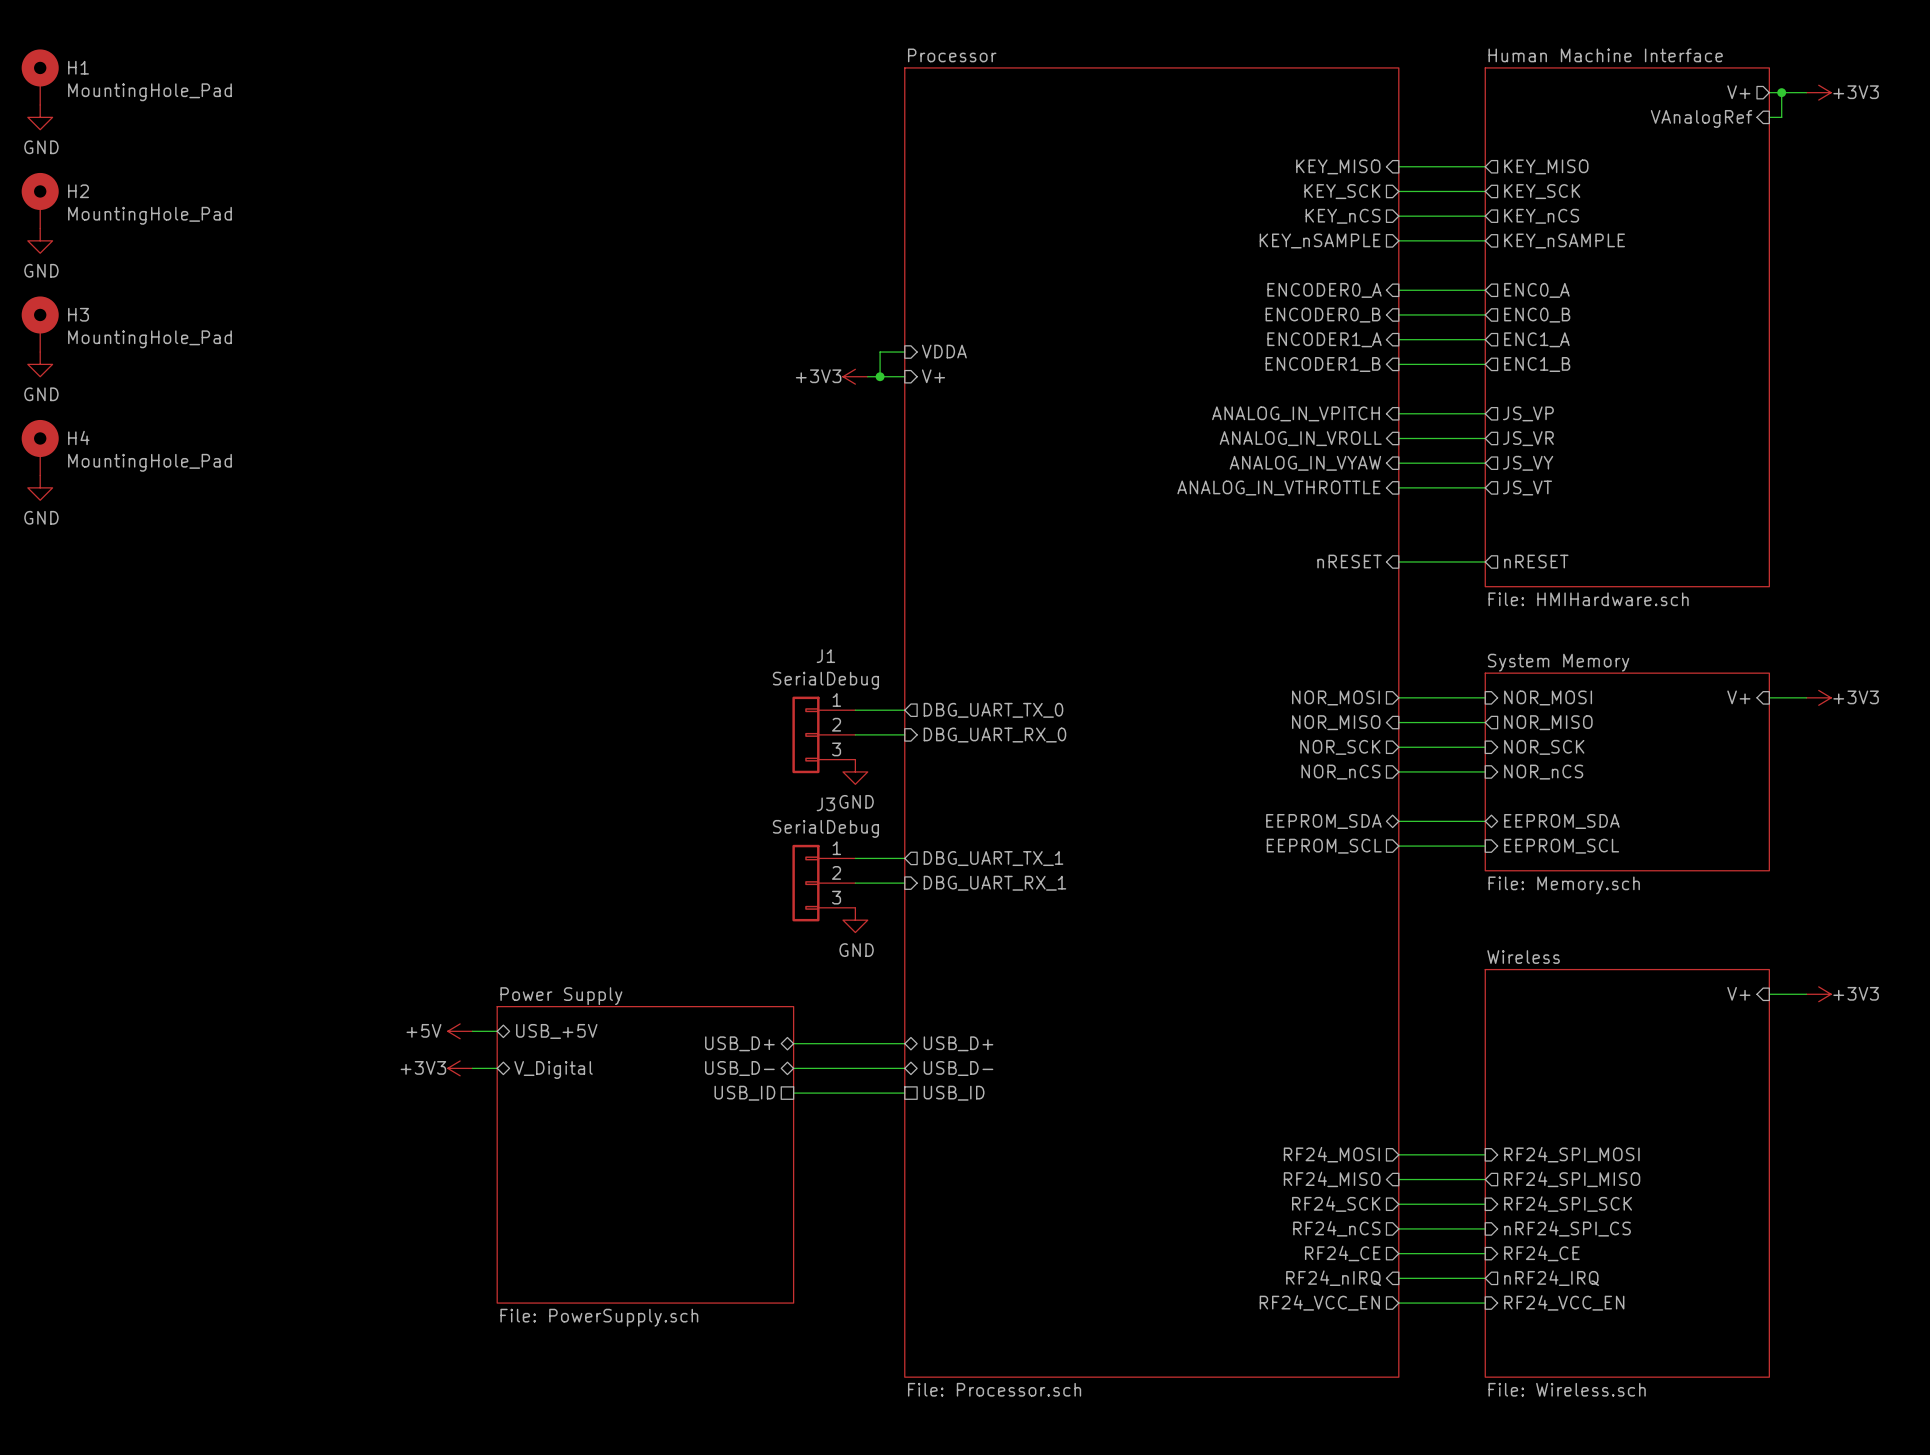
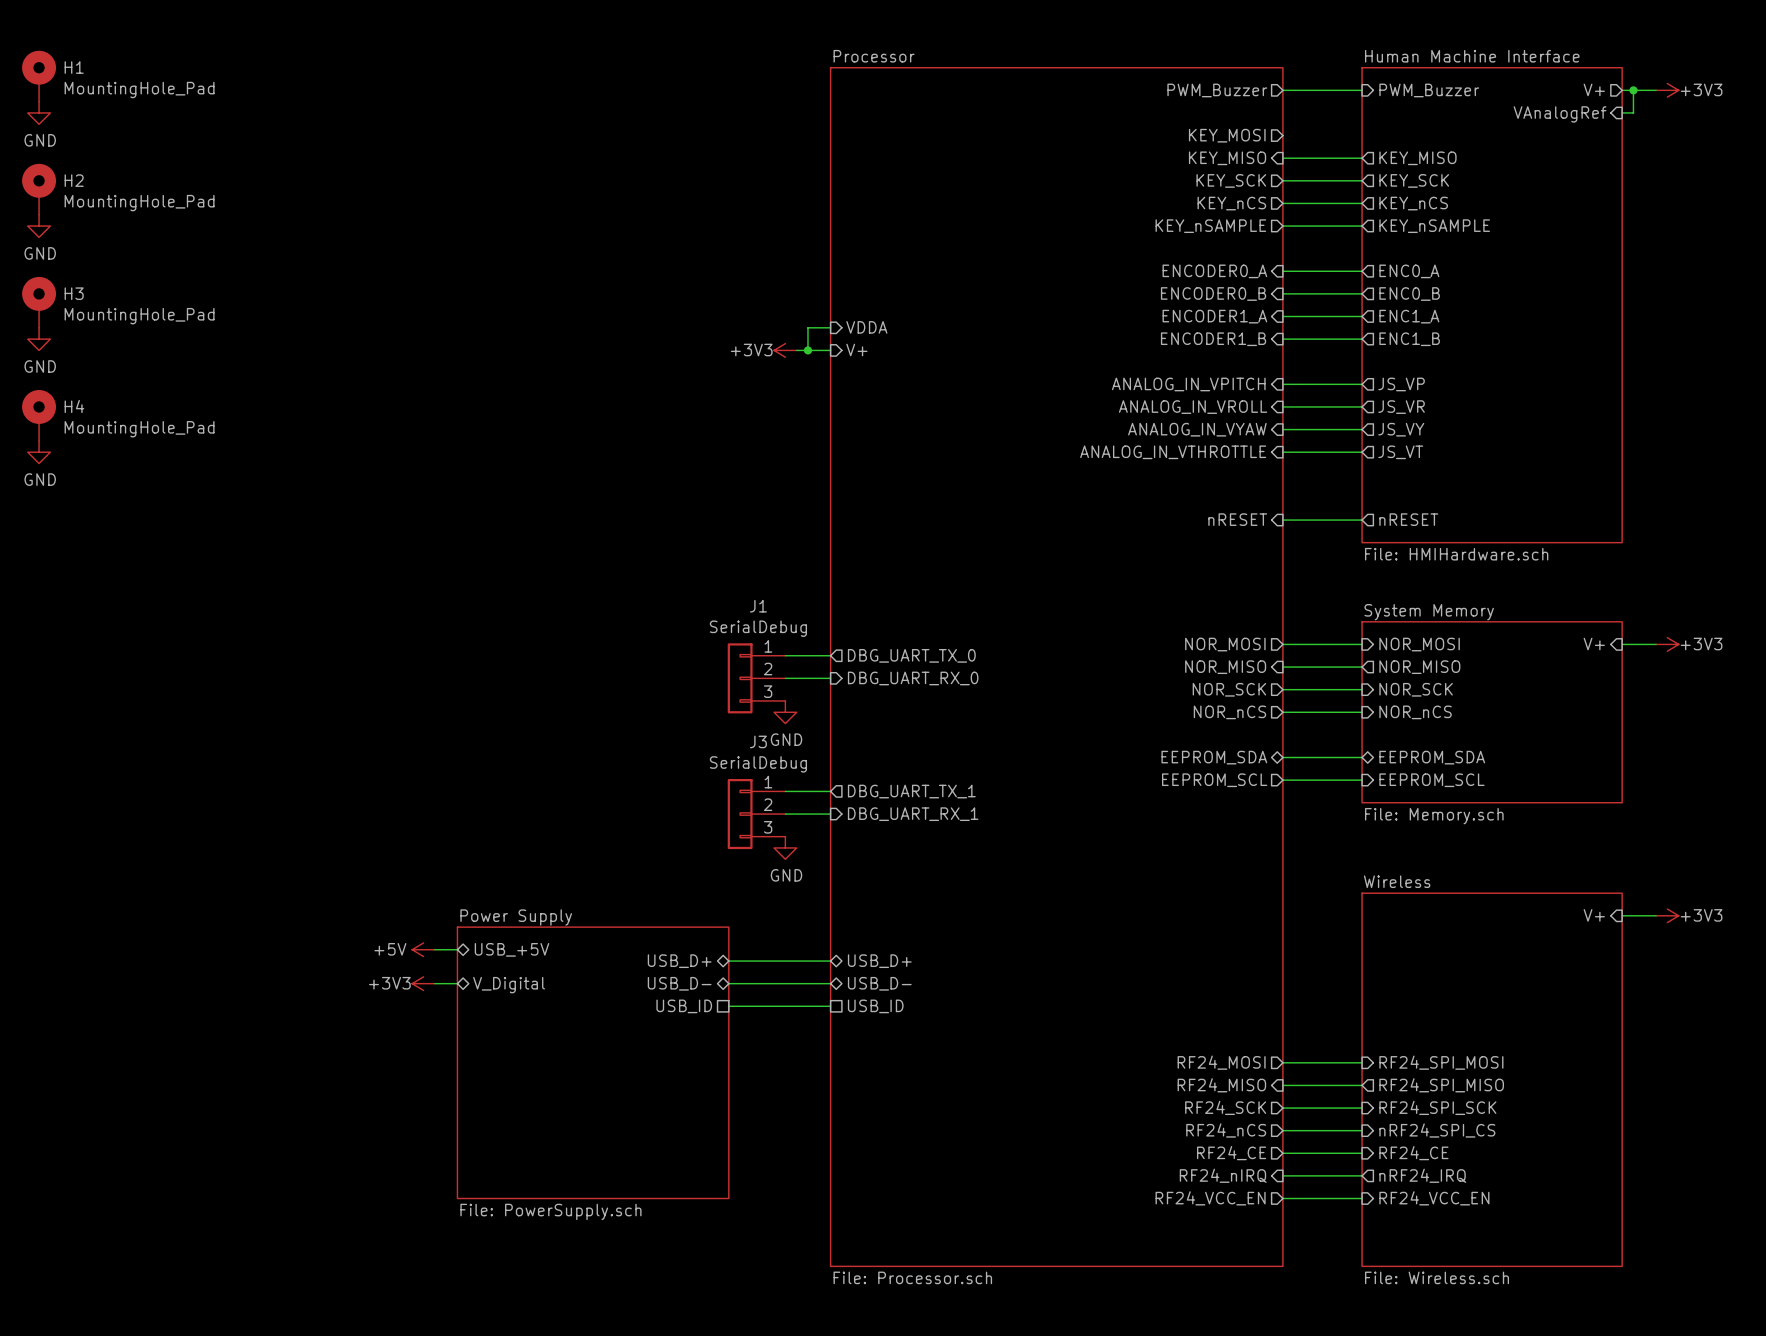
sheet pin: none -> PWM_Buzzer (1217, 90)
wire: none -> (1282, 90) (1362, 90)
sheet pin: none -> PWM_Buzzer (1429, 90)
sheet pin: none -> KEY_MOSI (1227, 135)

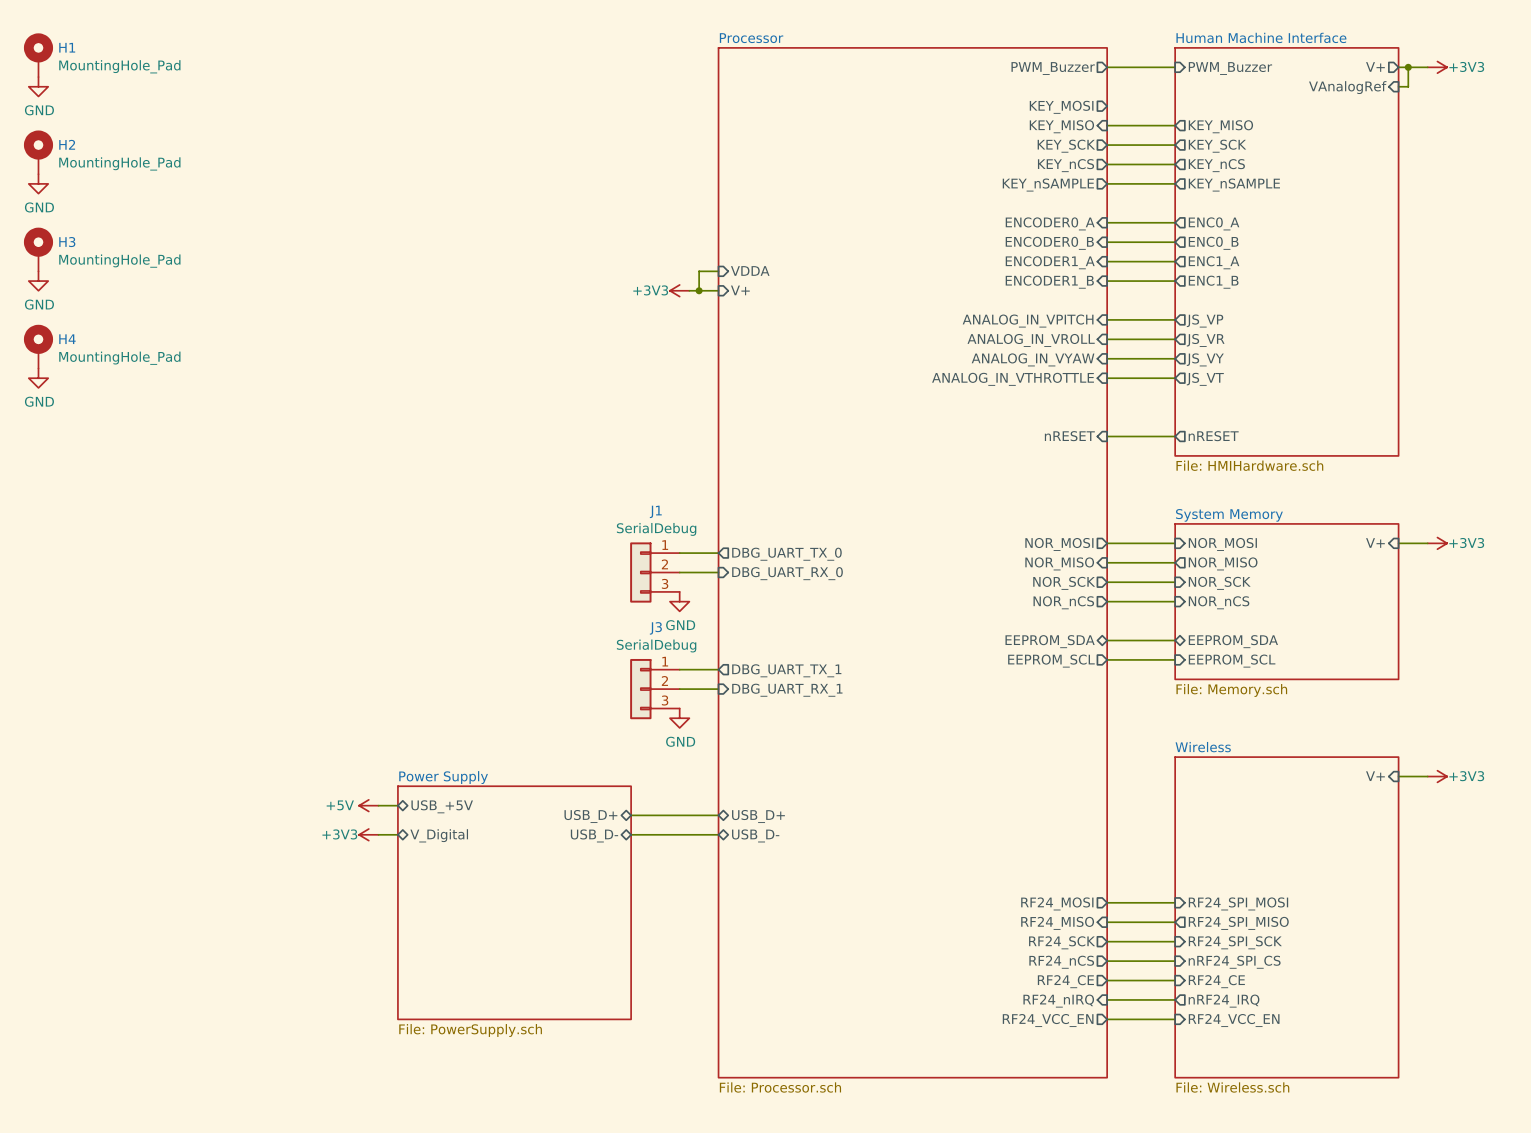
sheet pin: USB_ID (684, 1006) -> none
wire: (728, 1006) (830, 1006) -> none
sheet pin: USB_ID (875, 1006) -> none

